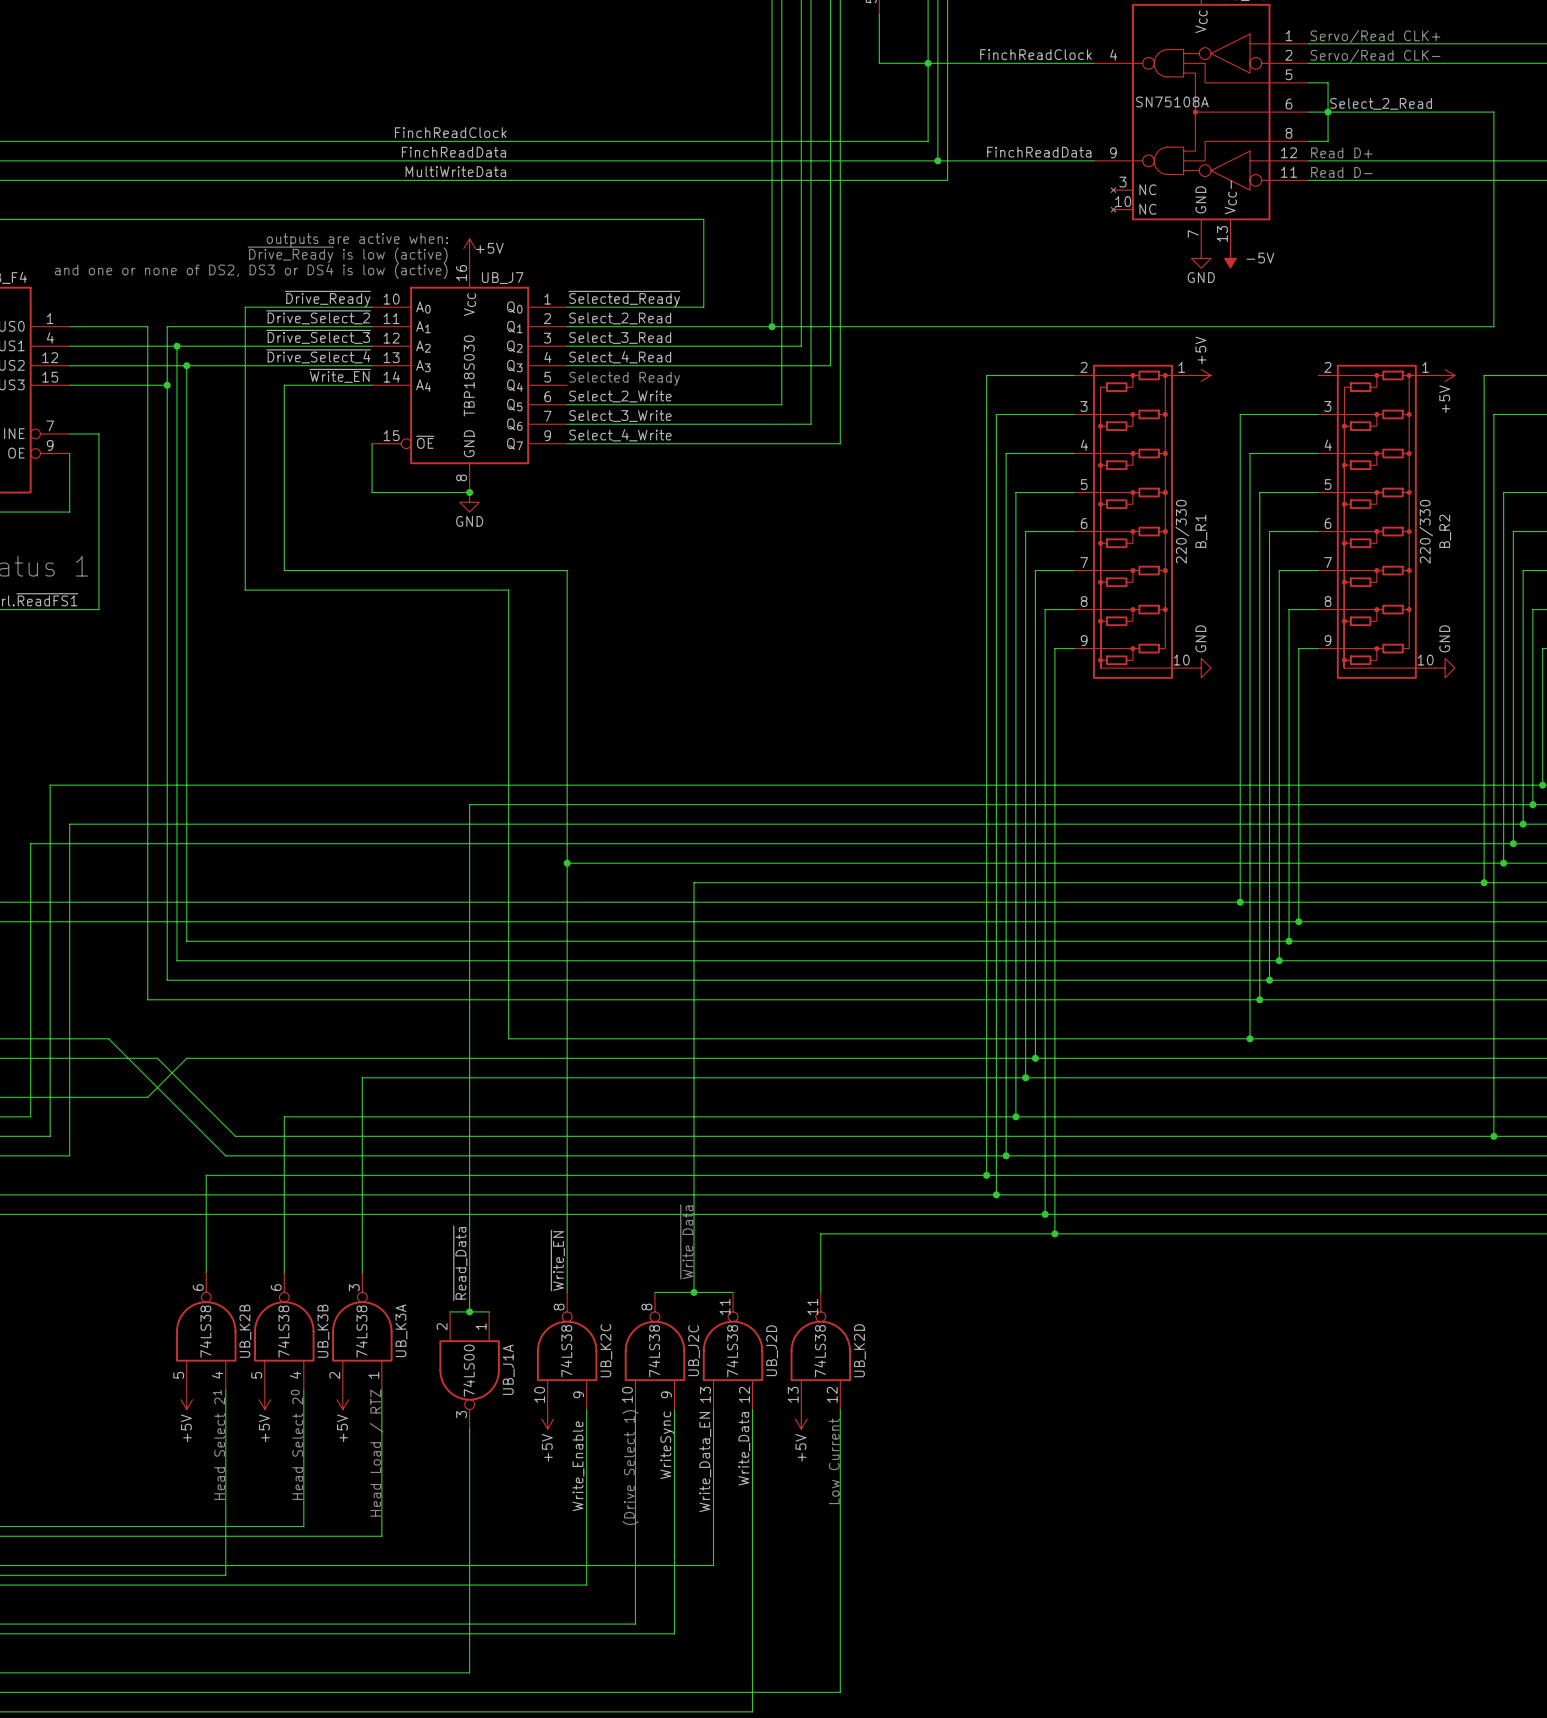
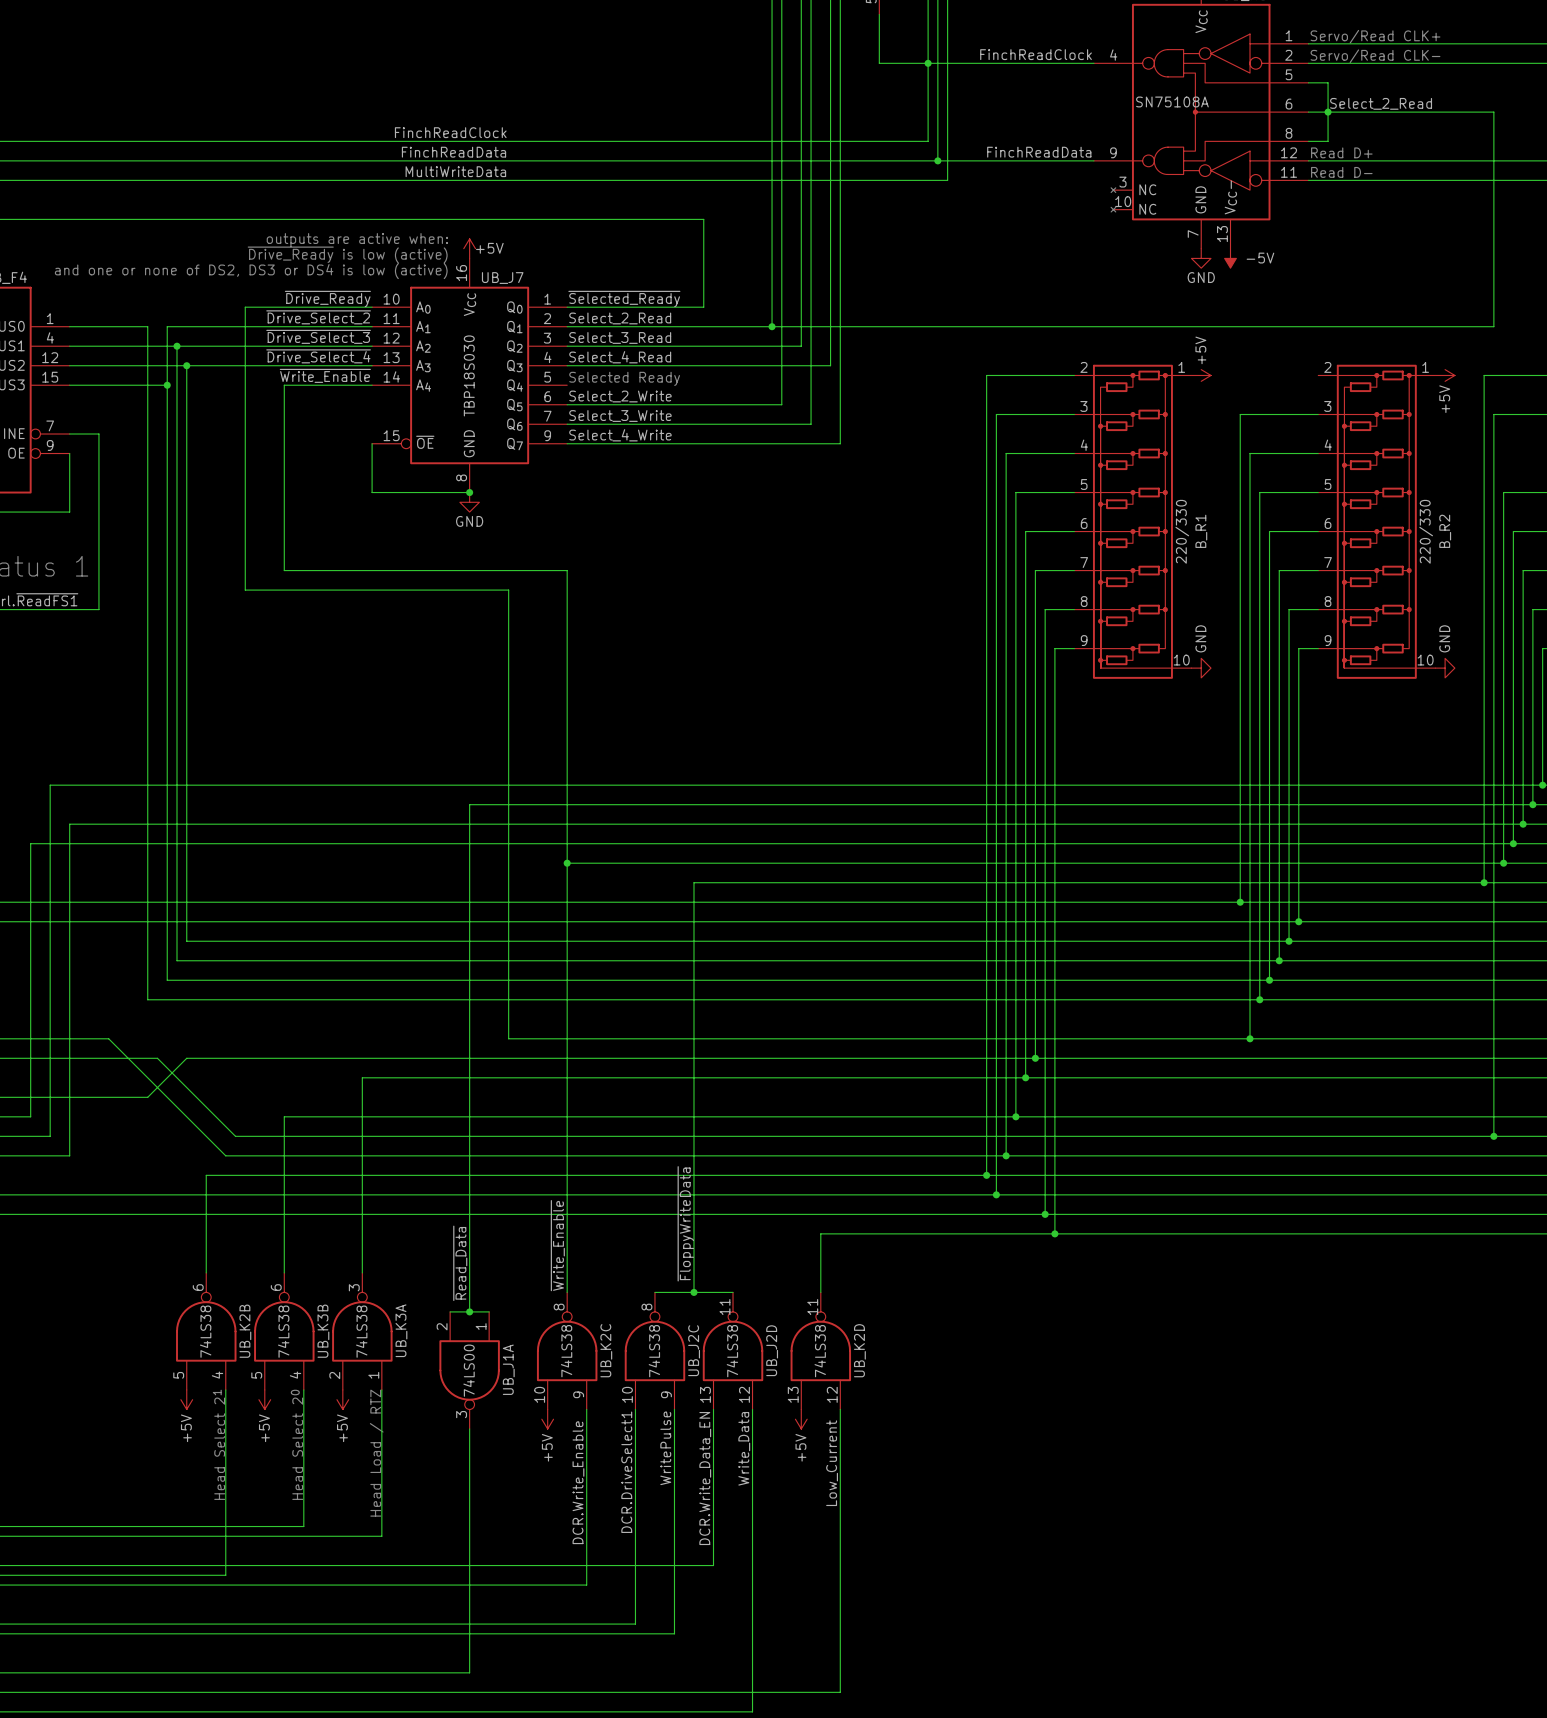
label: ~{Write_EN} (340, 375) -> ~{Write_Enable} (325, 375)
label: none -> ~{FloppyWriteData} (685, 1223)
text: ~{Write Data} (686, 1241) -> none
label: ~{Write_EN} (557, 1260) -> ~{Write_Enable} (557, 1245)
label: WriteSync (667, 1445) -> WritePulse (665, 1448)
text: Low Current (834, 1461) -> none
label: Write_Data_EN (705, 1462) -> DCR.Write_Data_EN (705, 1478)
label: none -> Low_Current (832, 1463)
label: Write_Enable (578, 1466) -> DCR.Write_Enable (578, 1482)
text: (Drive Select 1) (630, 1467) -> none
label: none -> DCR.DriveSelect1 (626, 1472)

